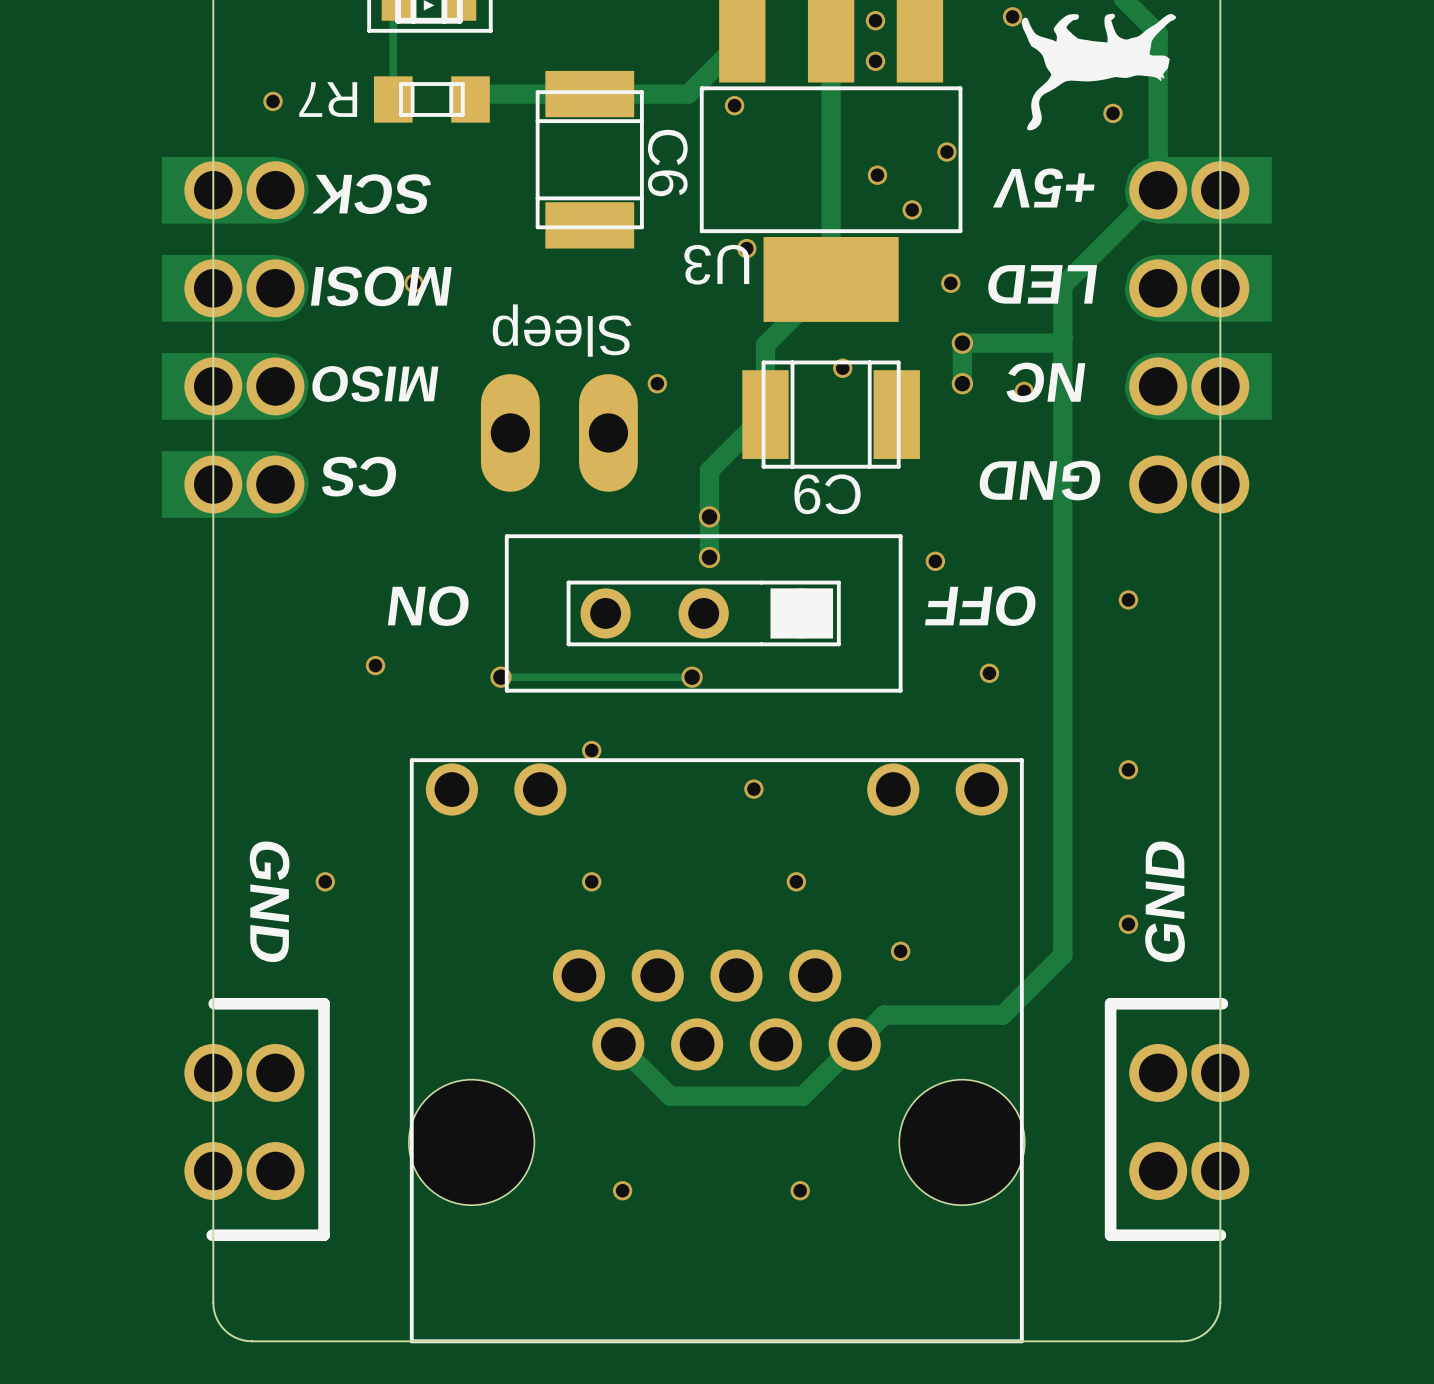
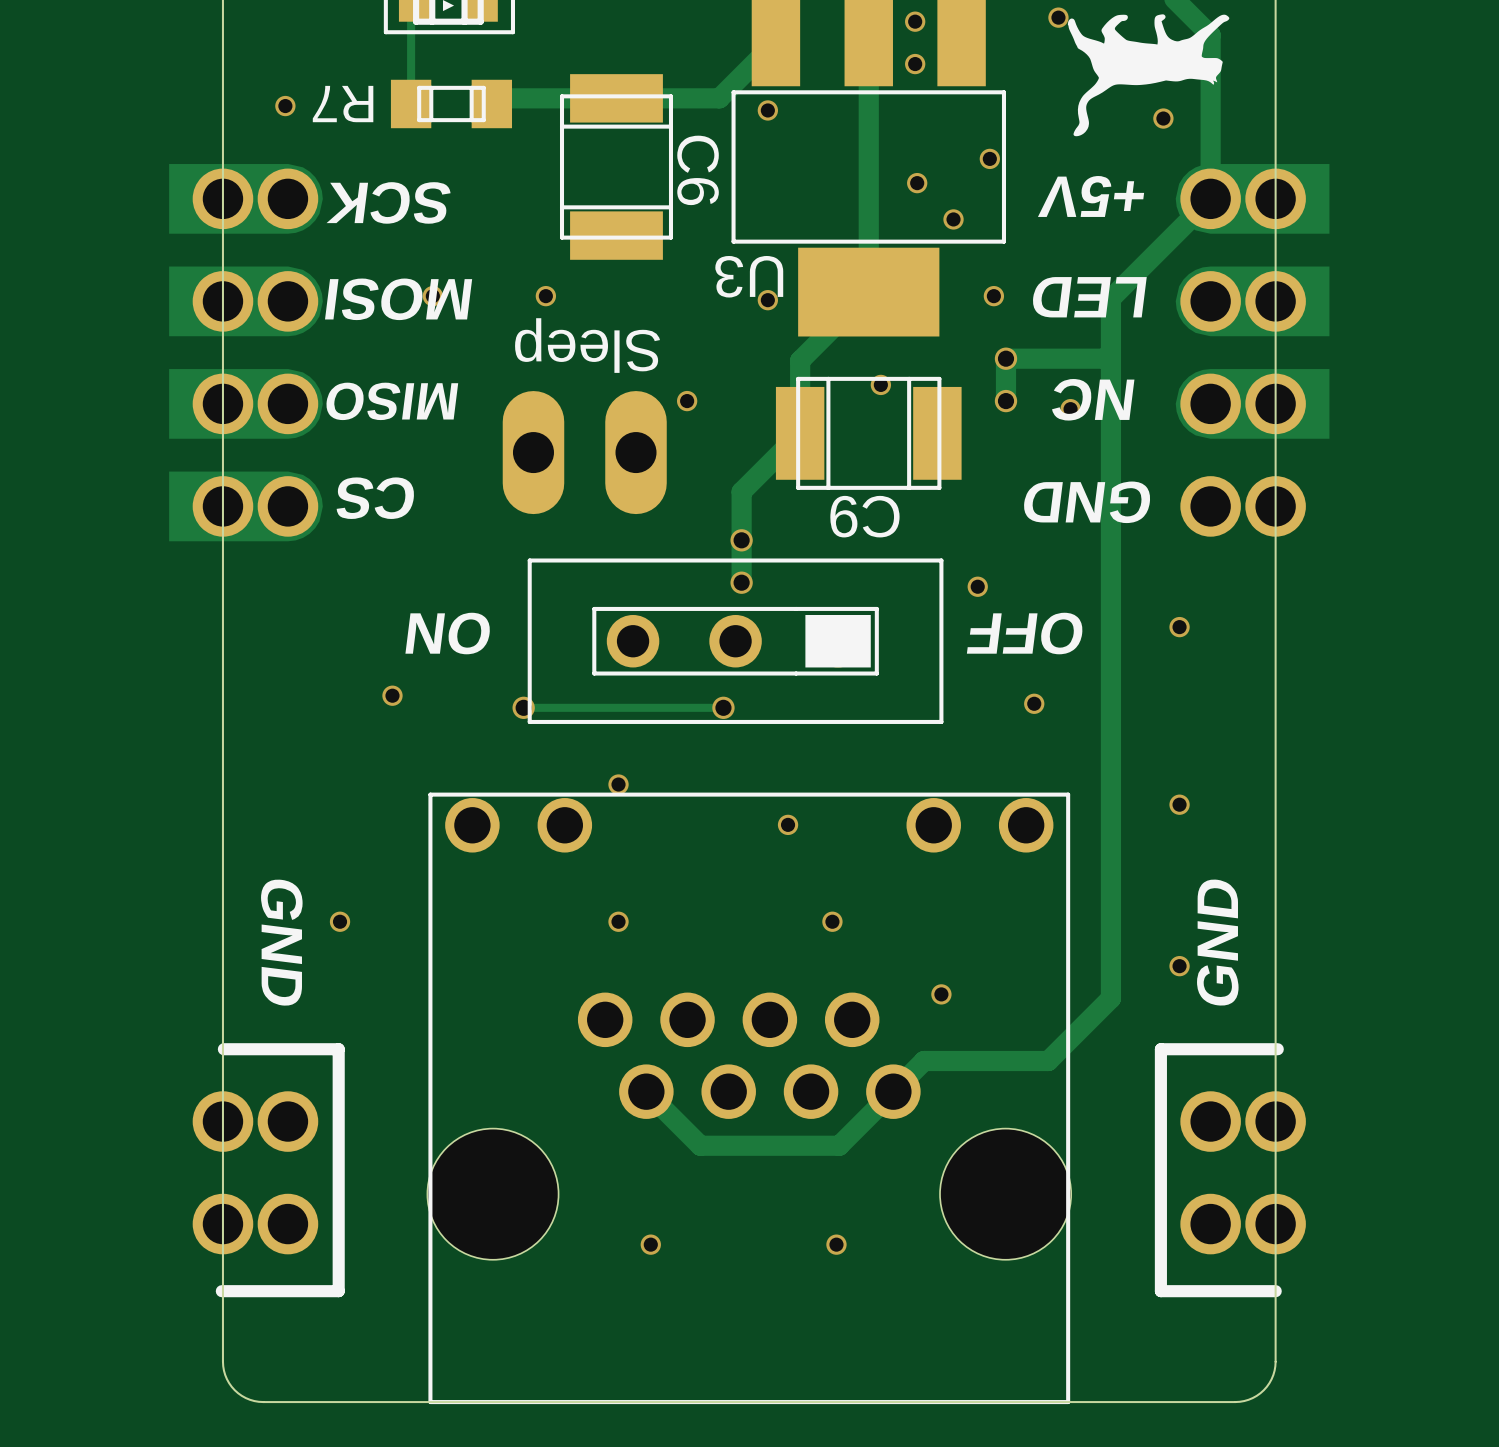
via position: (746, 248) -> (767, 300)
via: none -> (545, 296)

